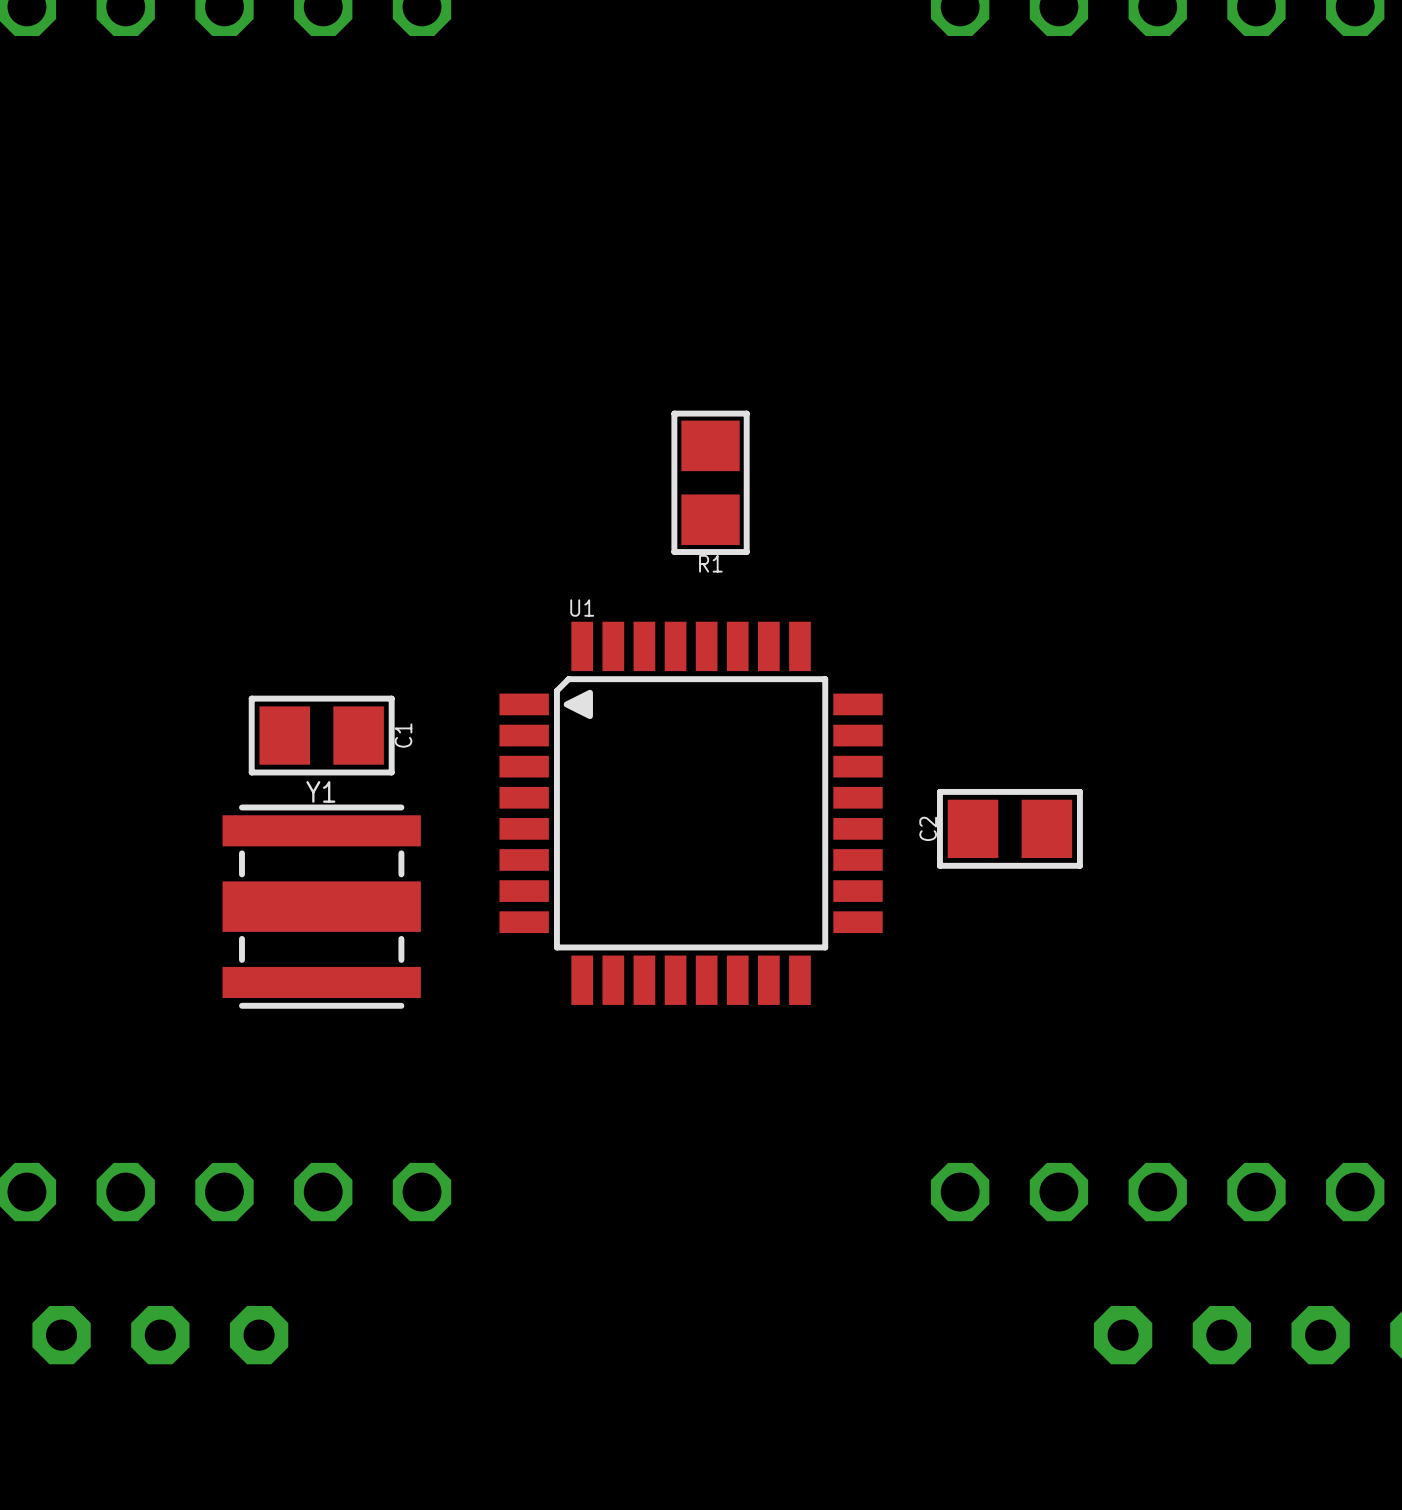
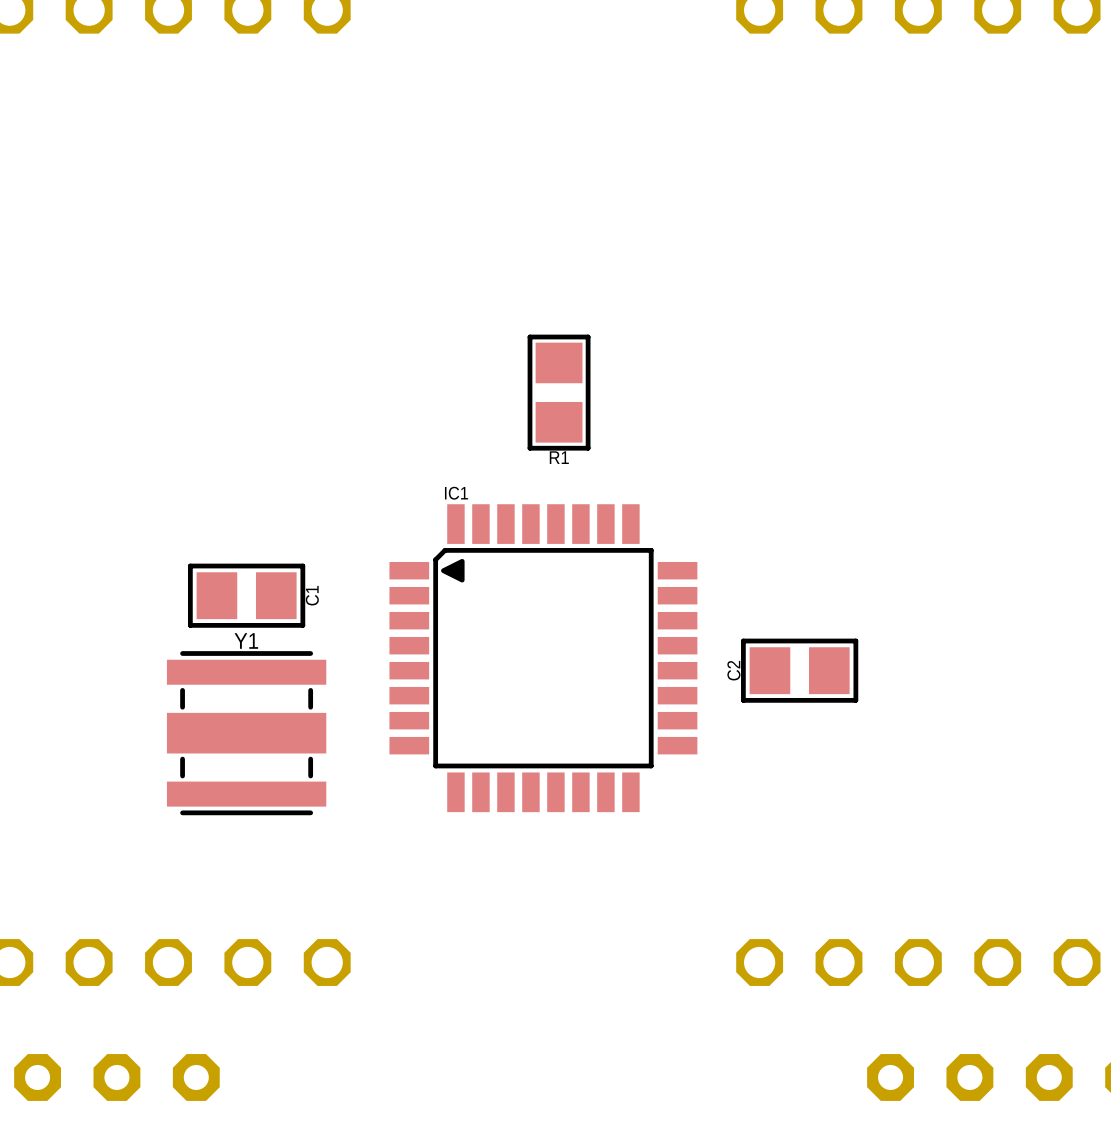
U1 name: U1 (582, 608) -> IC1 (456, 493)

